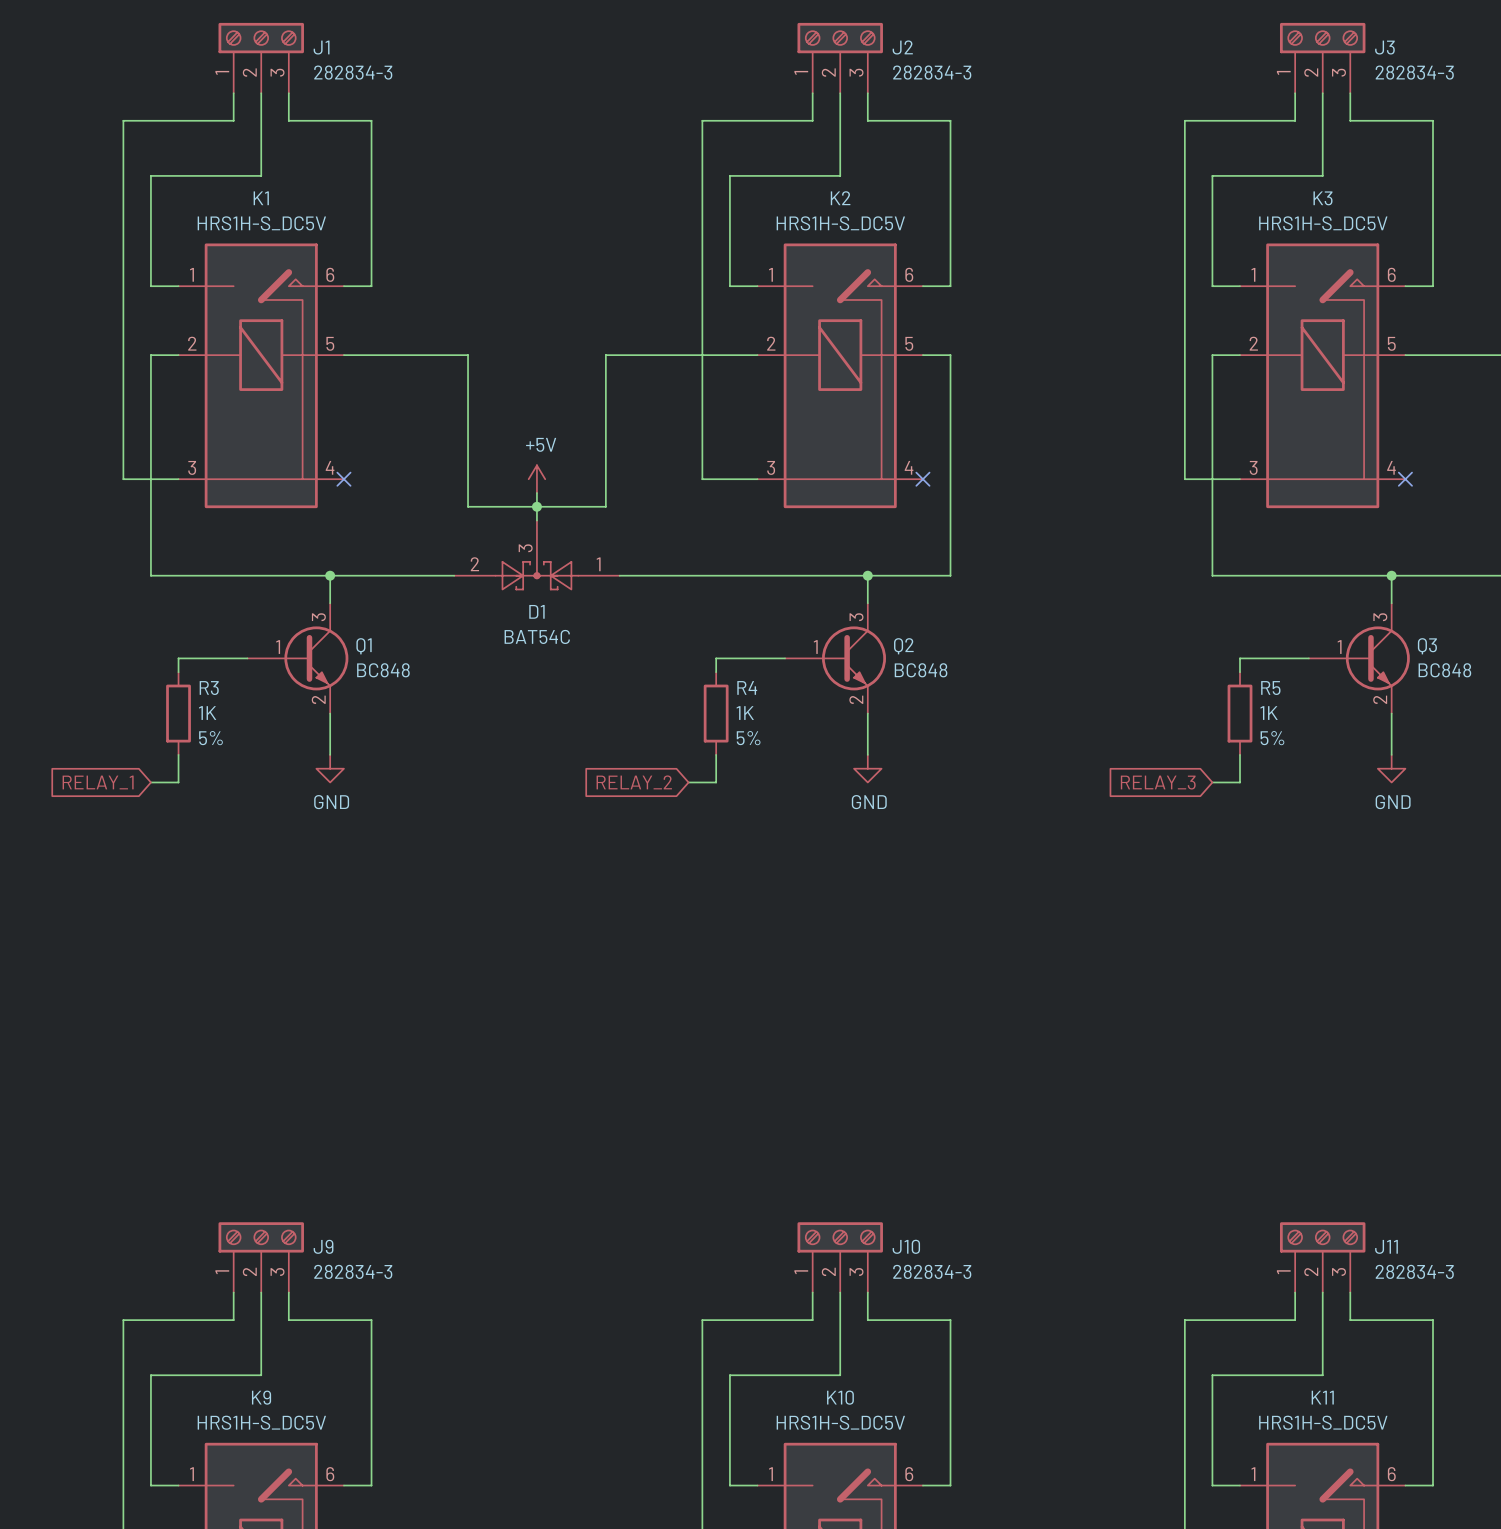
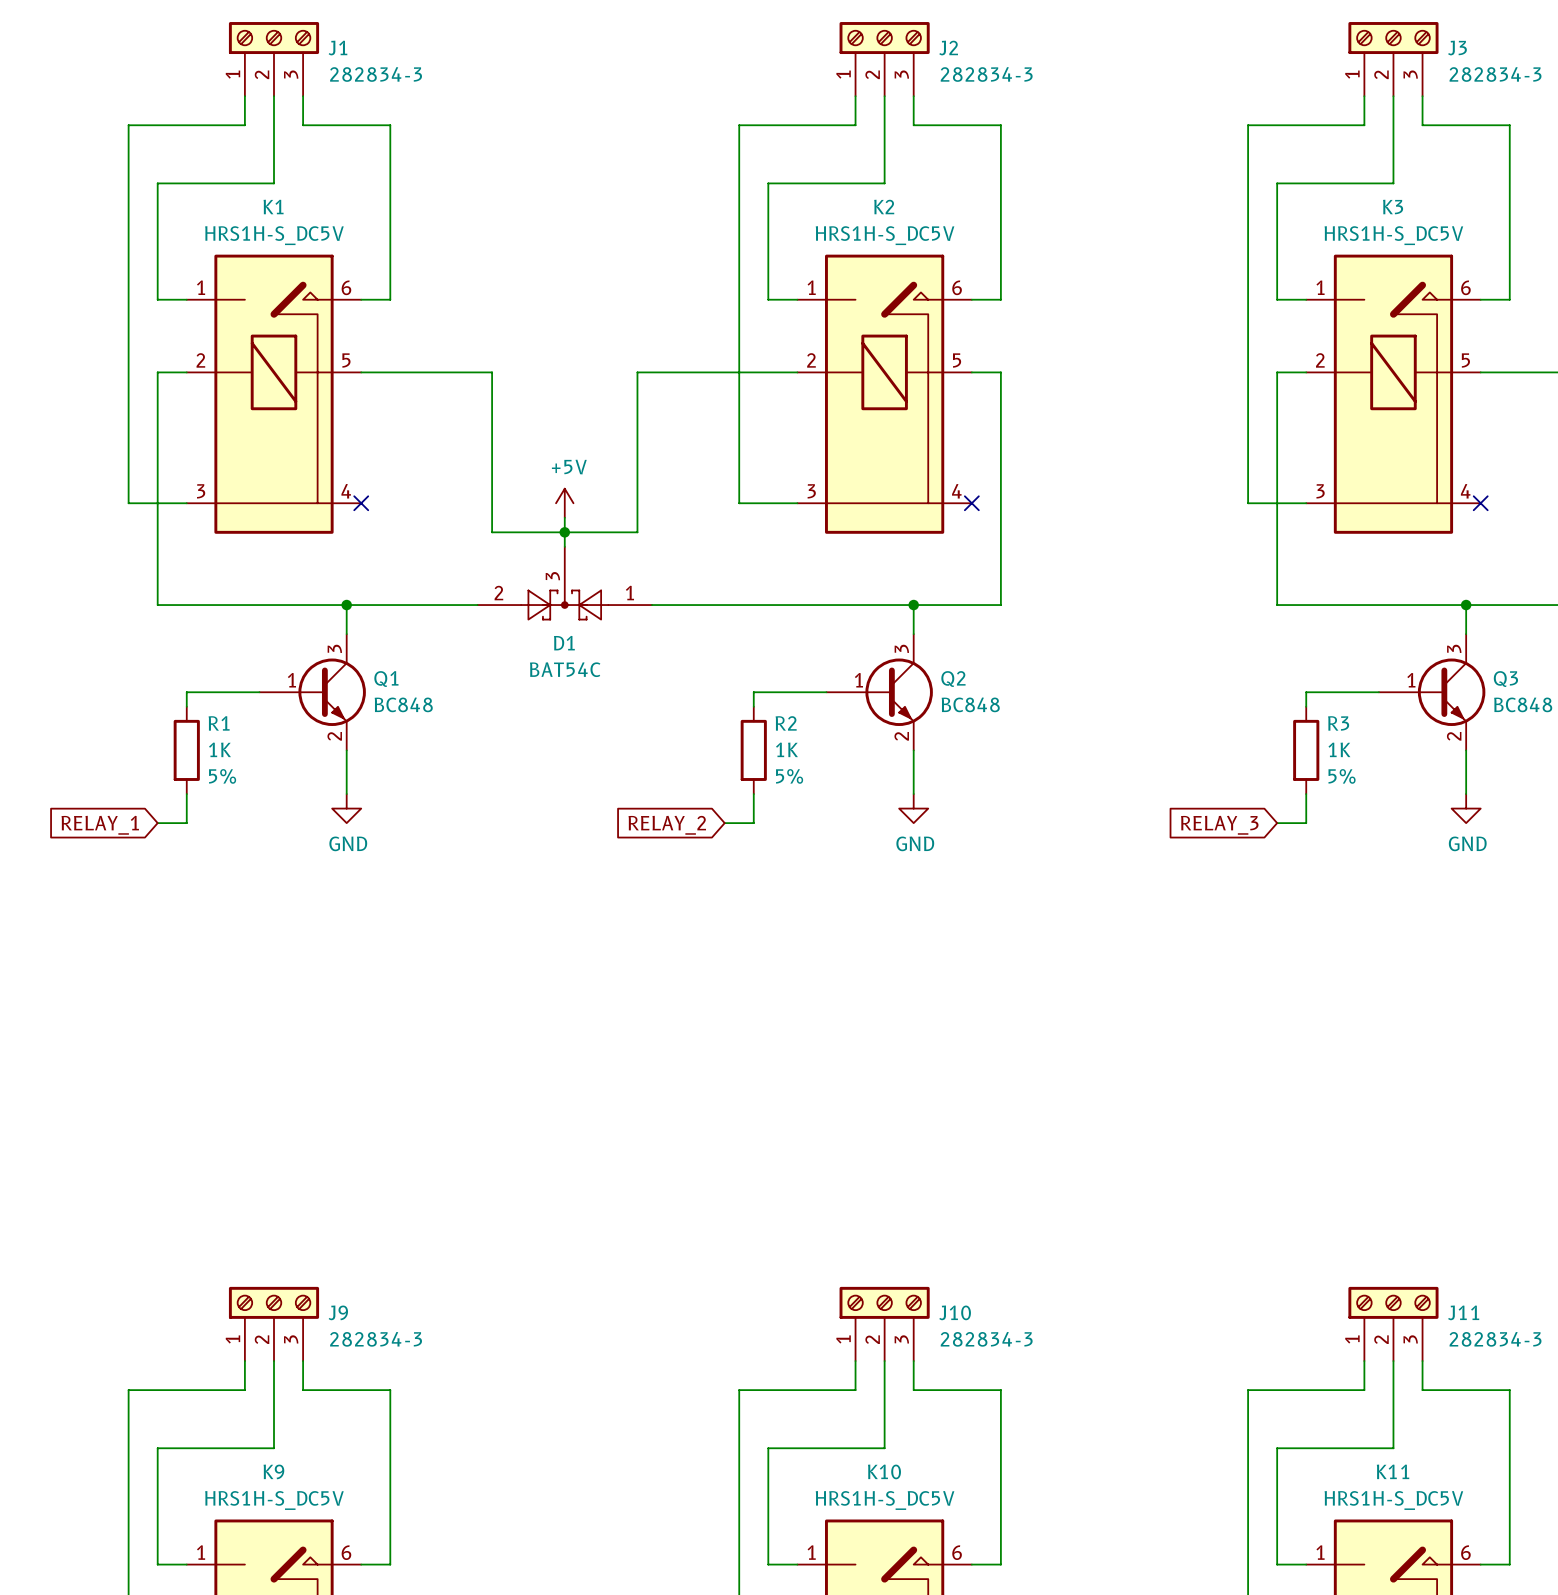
R4 name: R4 (747, 687) -> R2 (786, 723)
R3 name: R3 (209, 688) -> R1 (219, 723)
R5 name: R5 (1270, 688) -> R3 (1338, 723)

